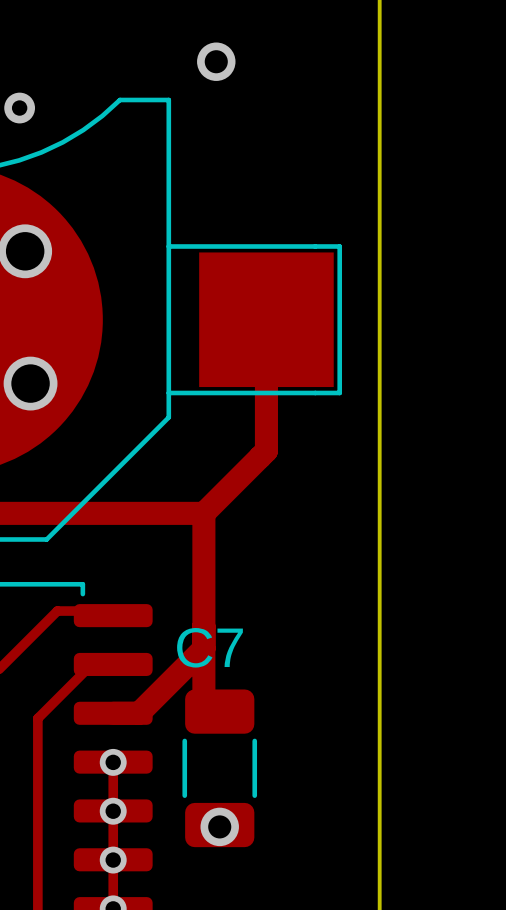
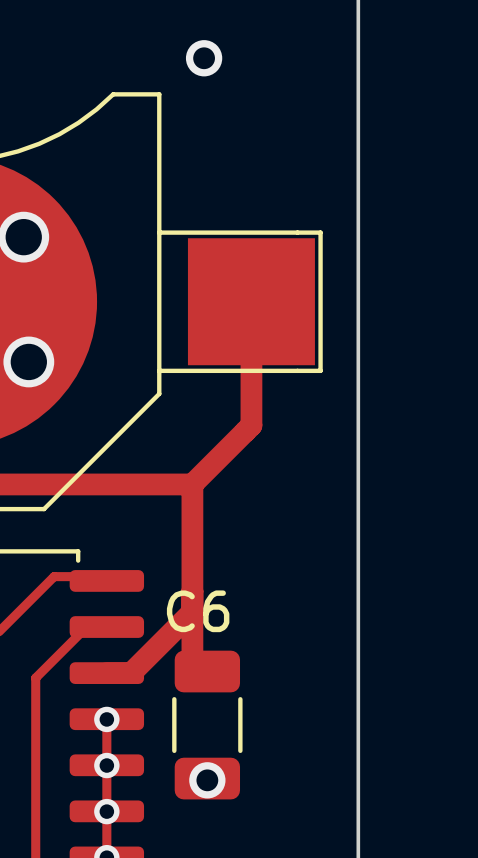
via: (19, 108) -> none
C7 name: C7 (209, 647) -> C6 (198, 611)

